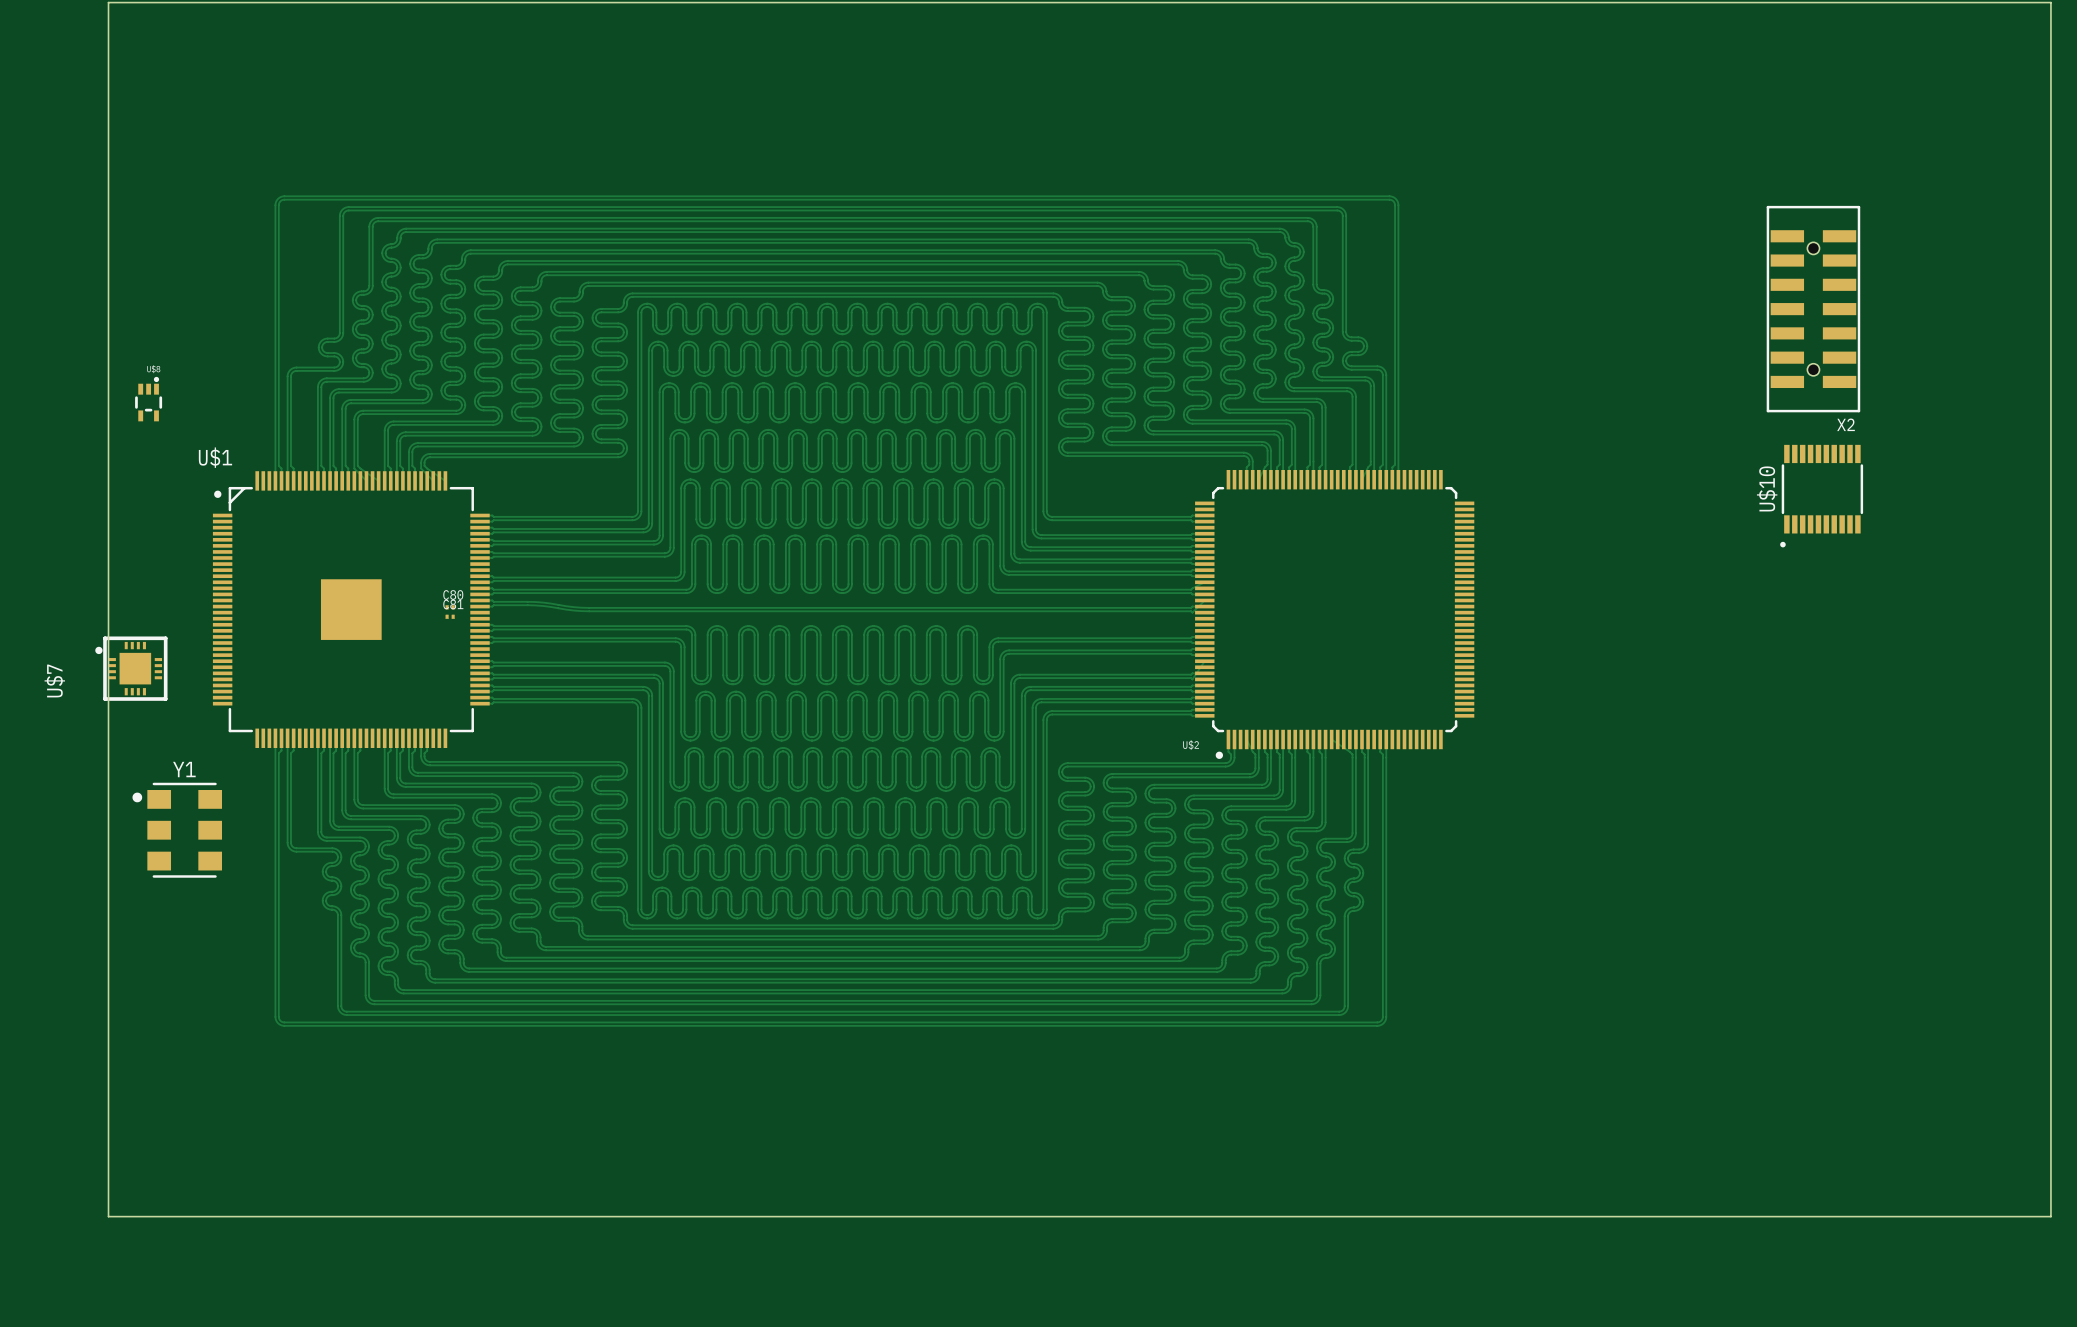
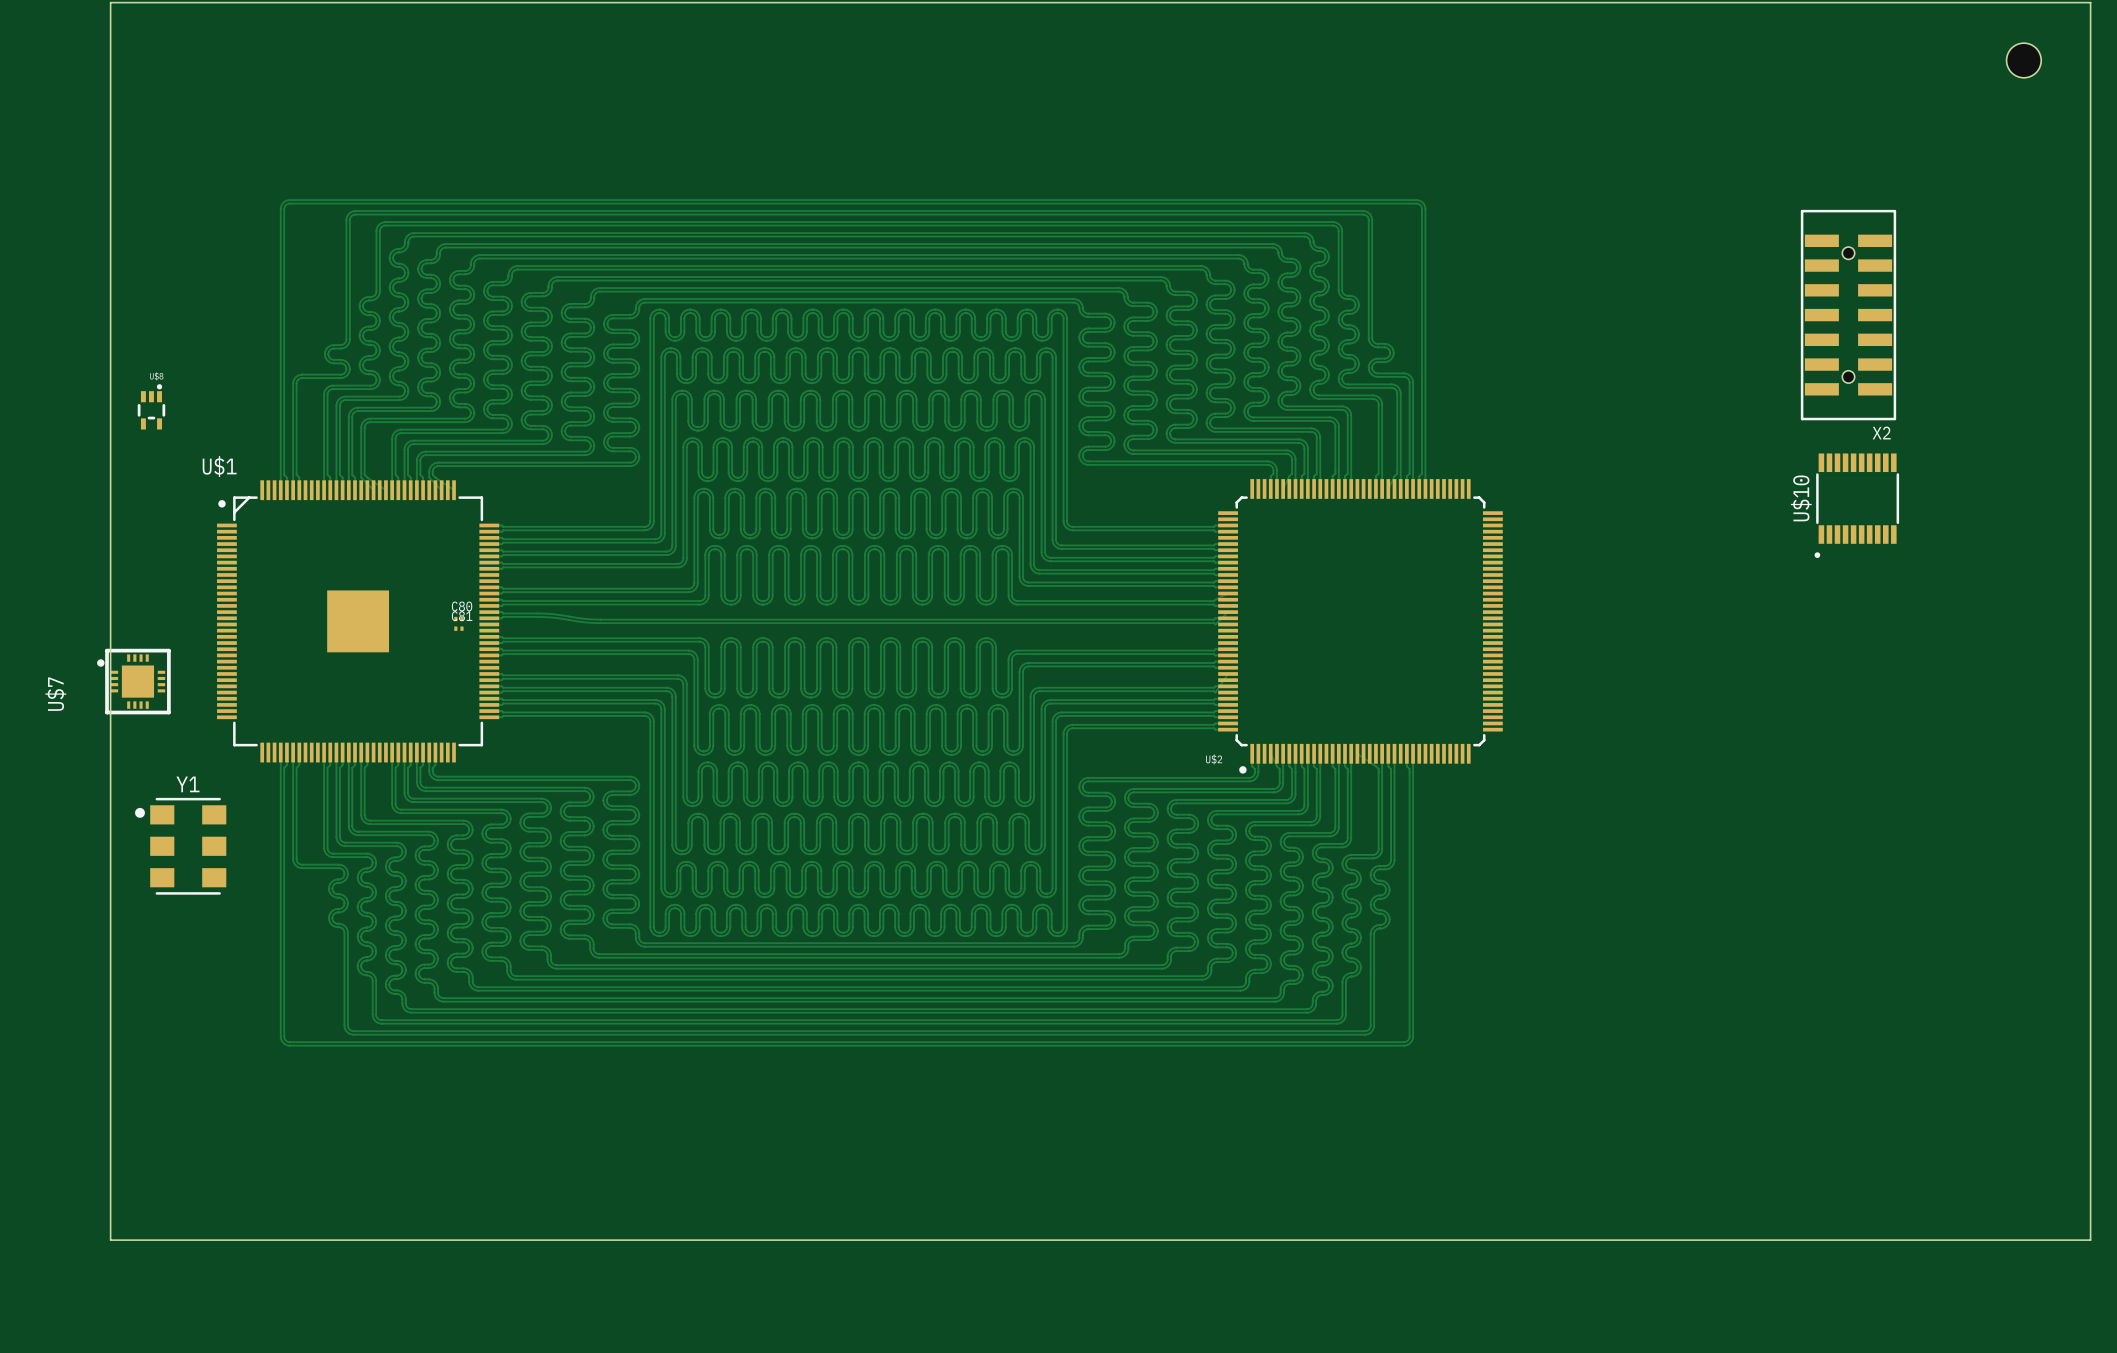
part: none -> (2023, 60)

